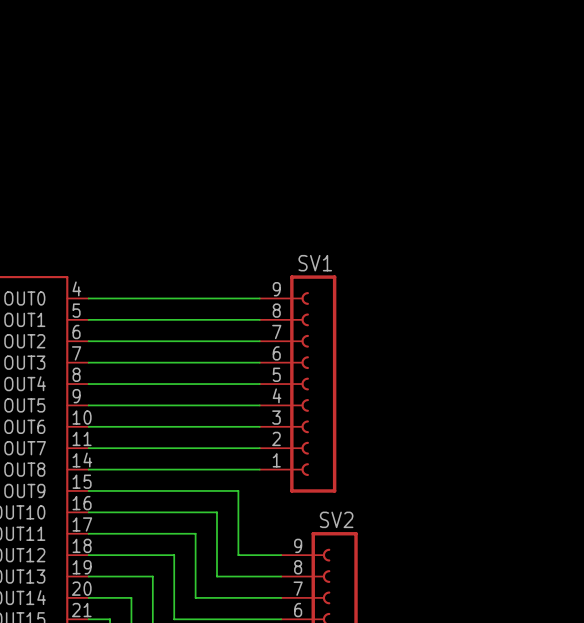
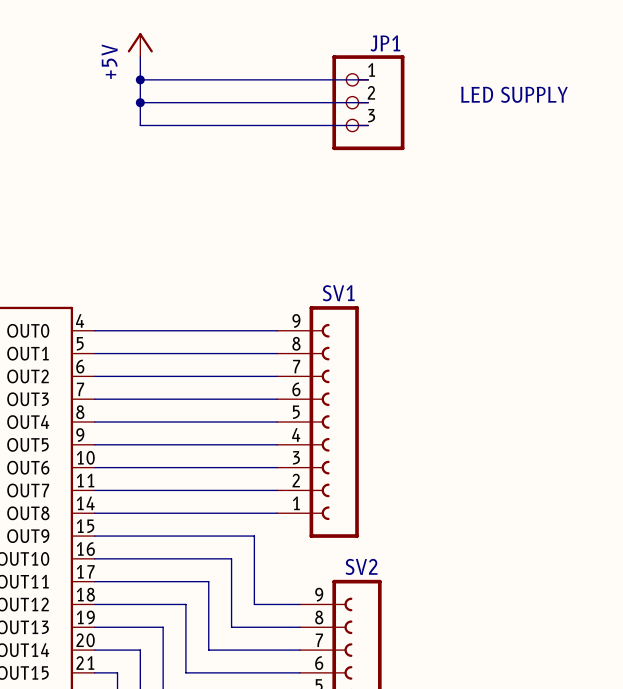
power symbol: none -> +5V (140, 45)
wire: none -> (140, 57) (140, 125) (368, 125)
wire: none -> (140, 79) (368, 79)
junction: none -> (140, 79)
text: none -> LED SUPPLY (514, 94)
wire: none -> (140, 102) (368, 102)
junction: none -> (140, 102)
JP1: none -> (368, 102)

